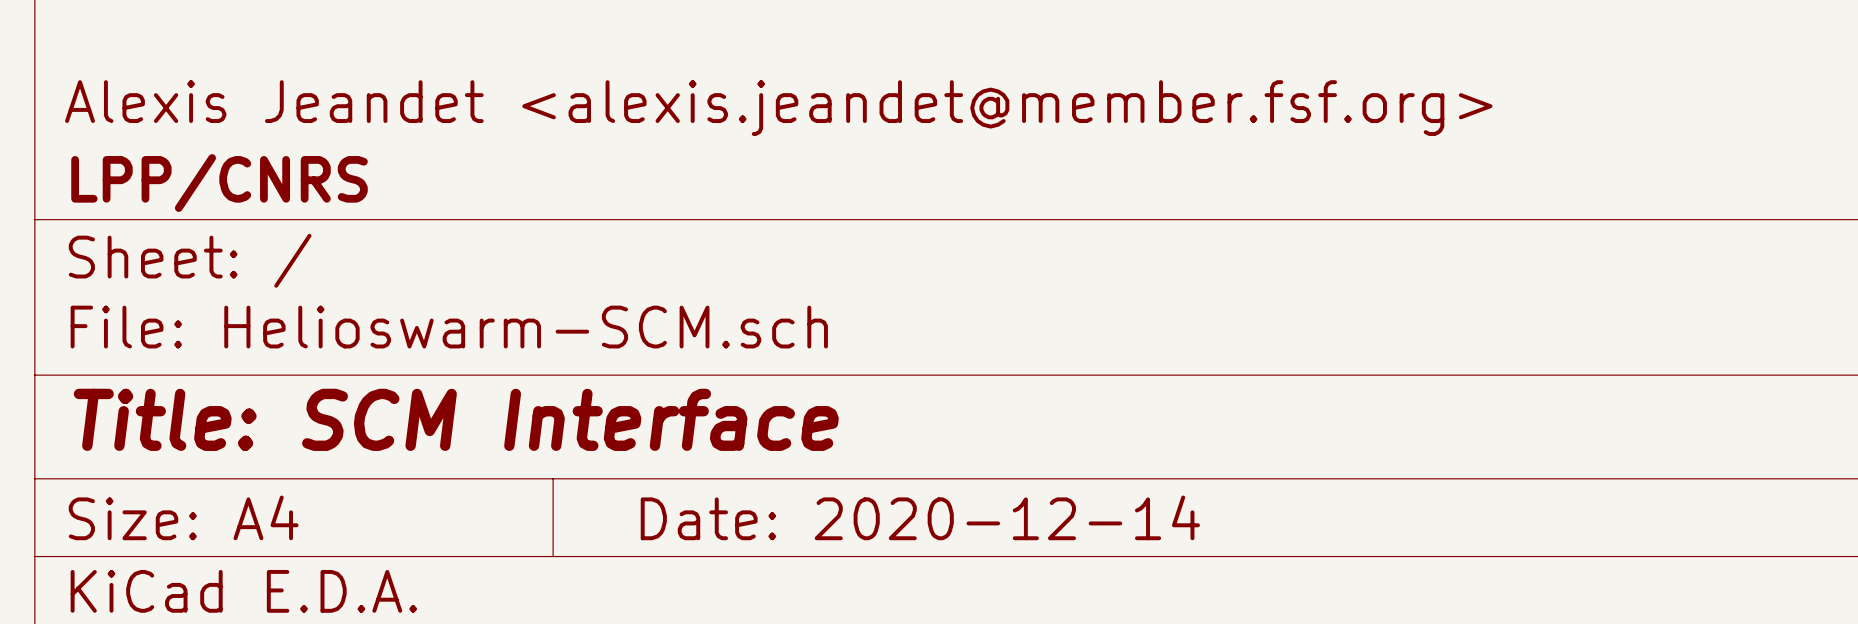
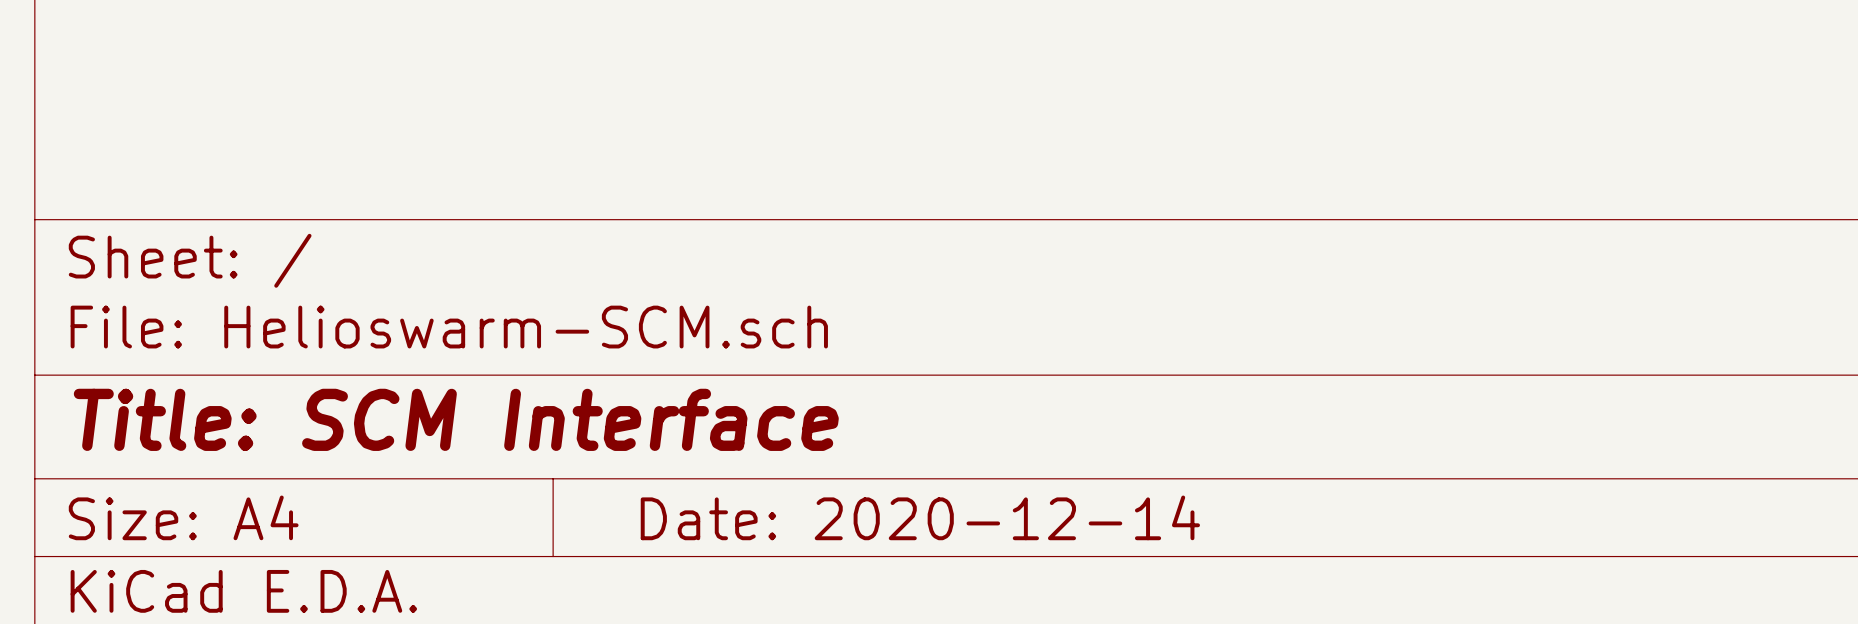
title block: Alexis Jeandet <alexis.jeandet@member.fsf.org> (778, 108) -> none
title block: LPP/CNRS (219, 183) -> none

